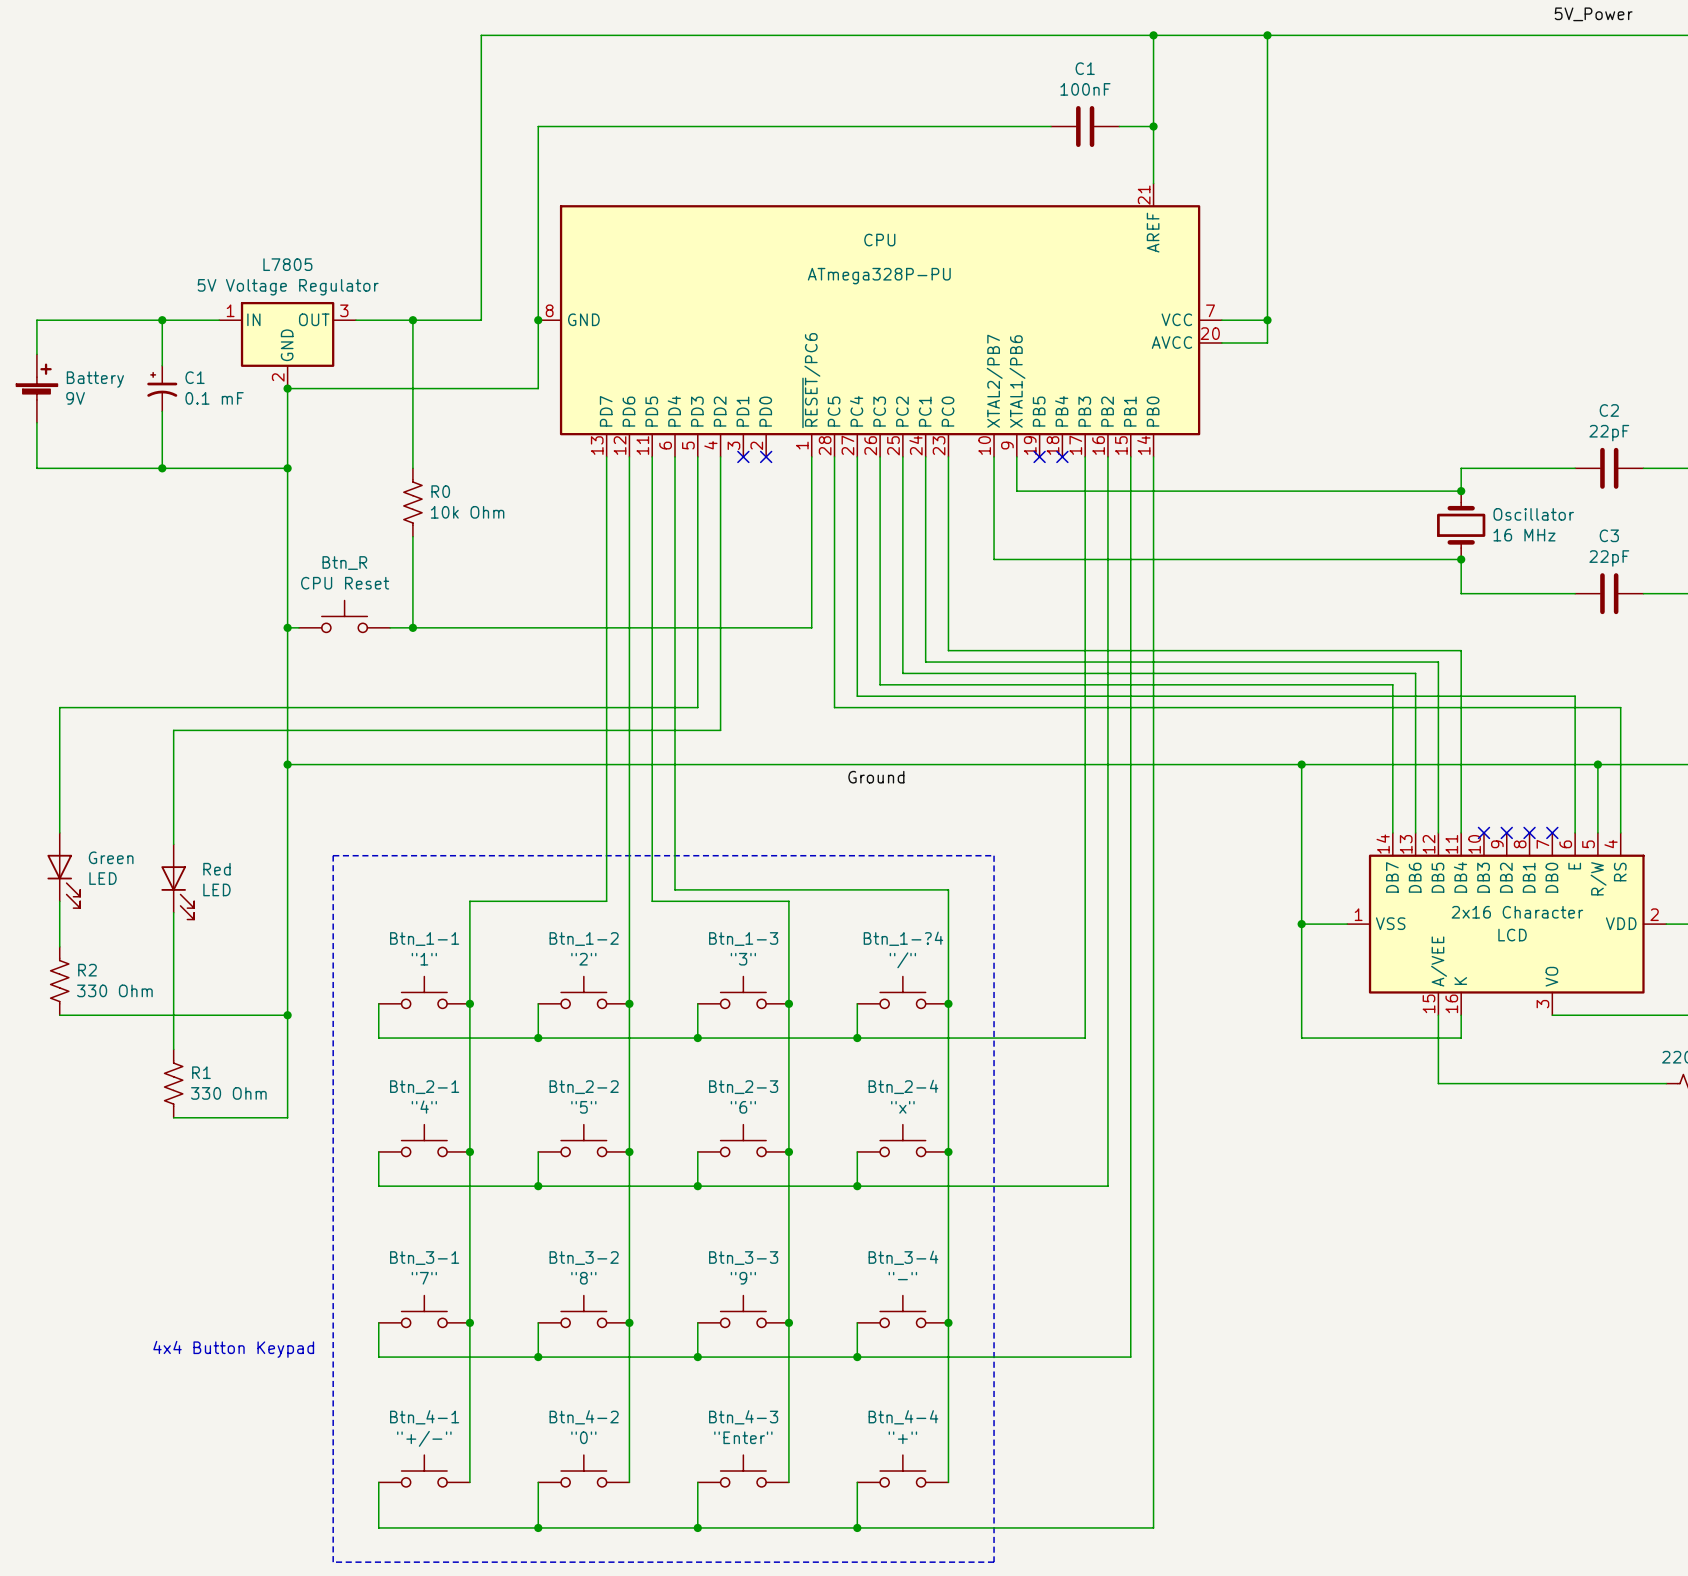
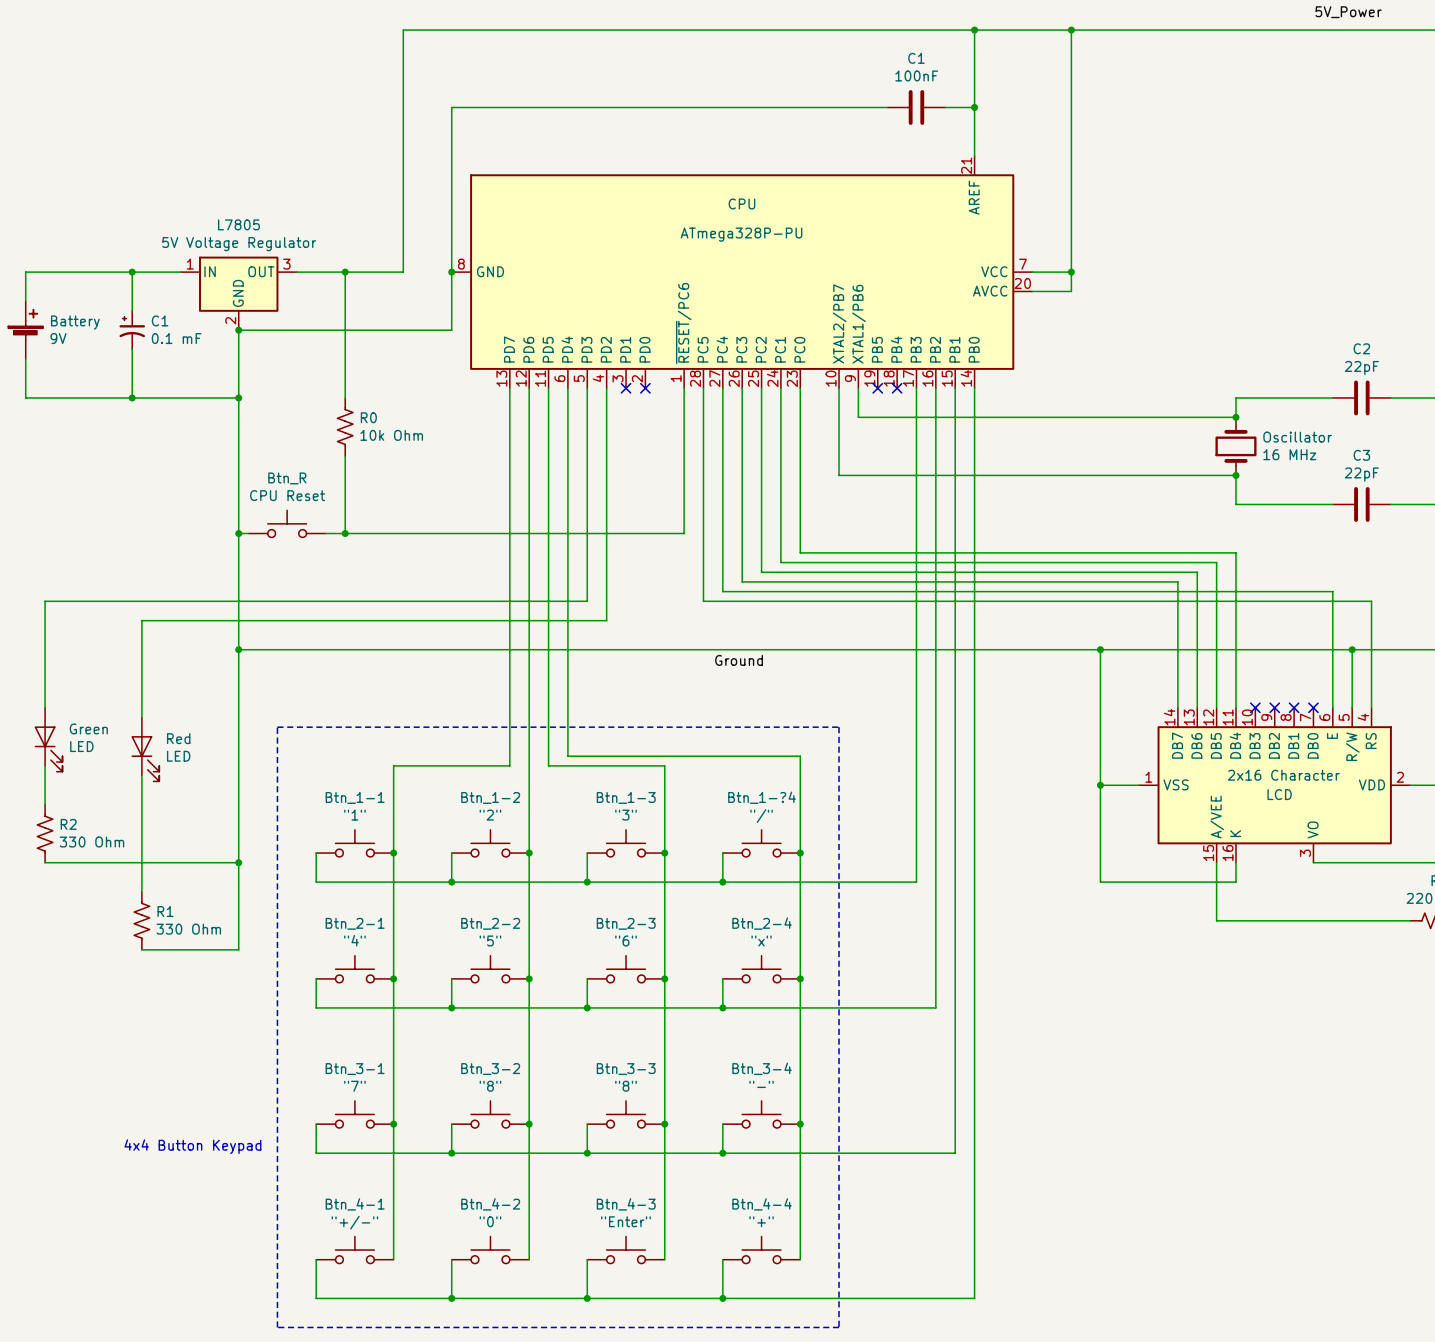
Btn_3-3 value: "9" (743, 1278) -> "8" (626, 1086)

